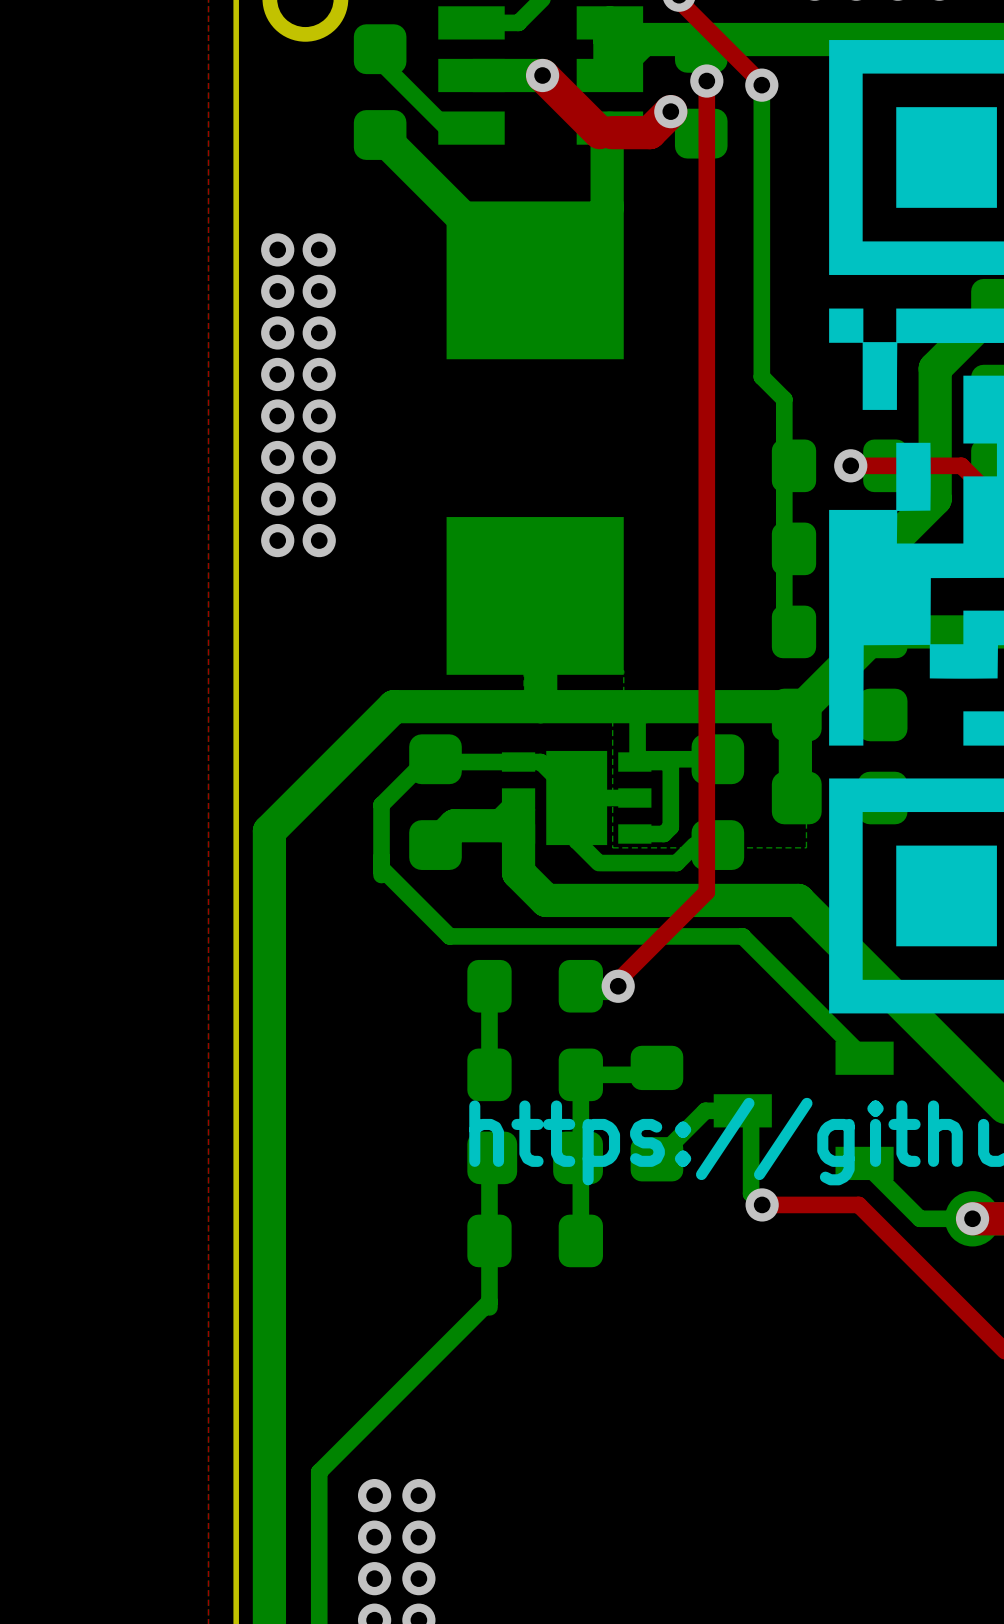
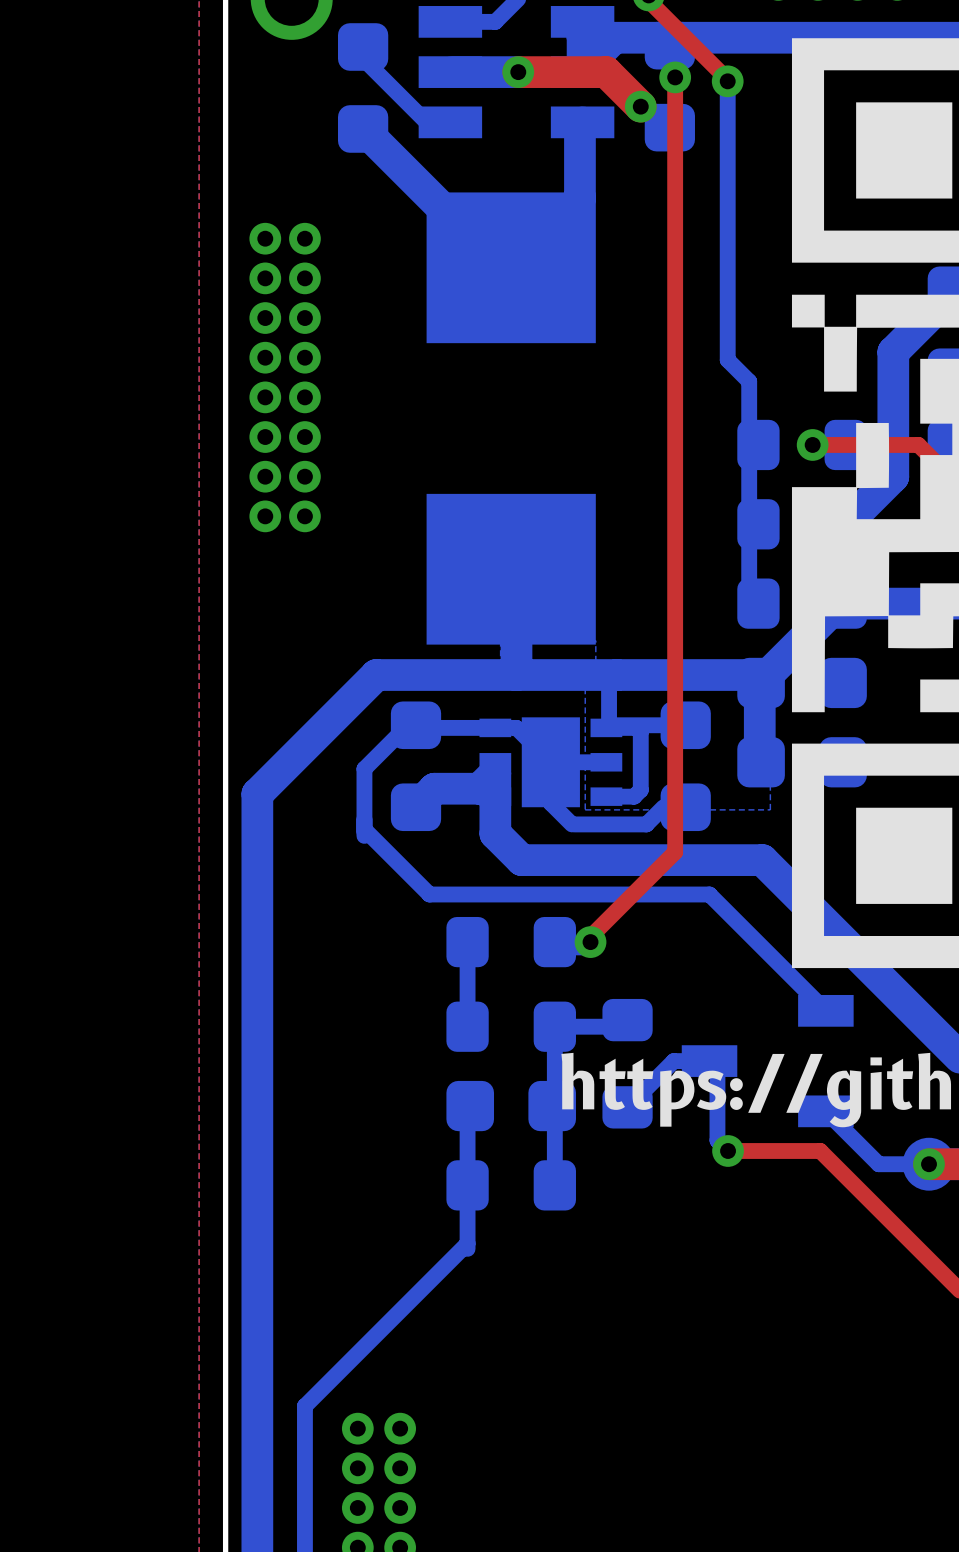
top track: (542, 75) (599, 132) -> (518, 72) (606, 72) (640, 106)
top track: (670, 111) (649, 132) (611, 132) -> none

